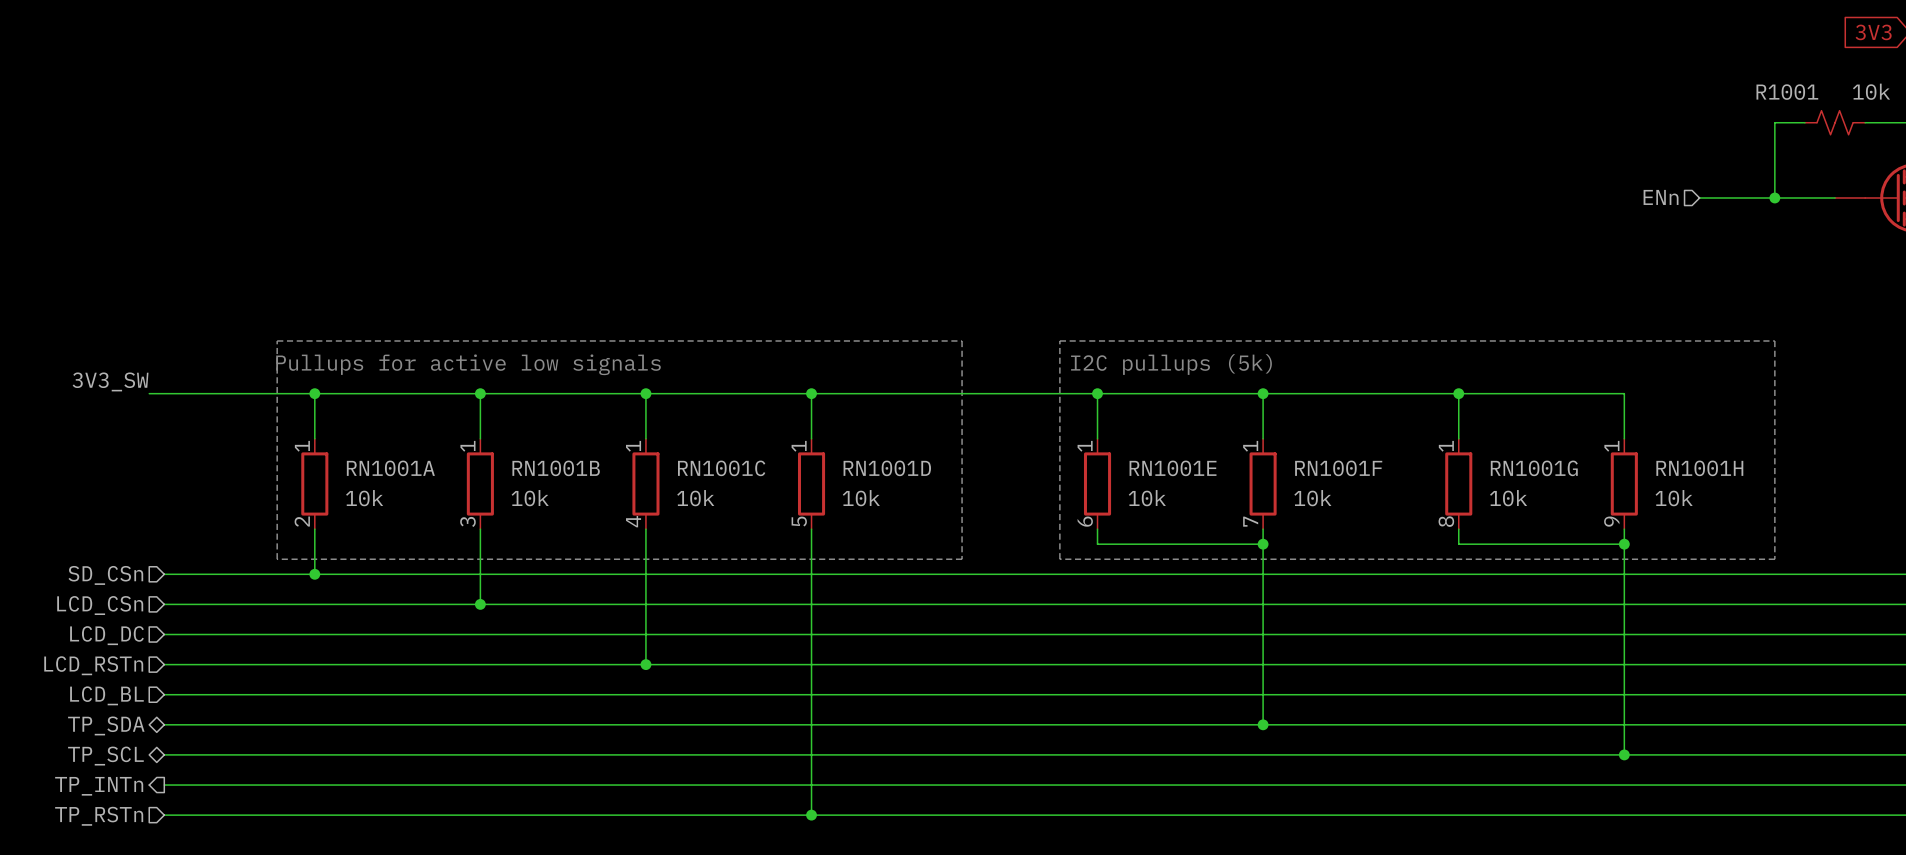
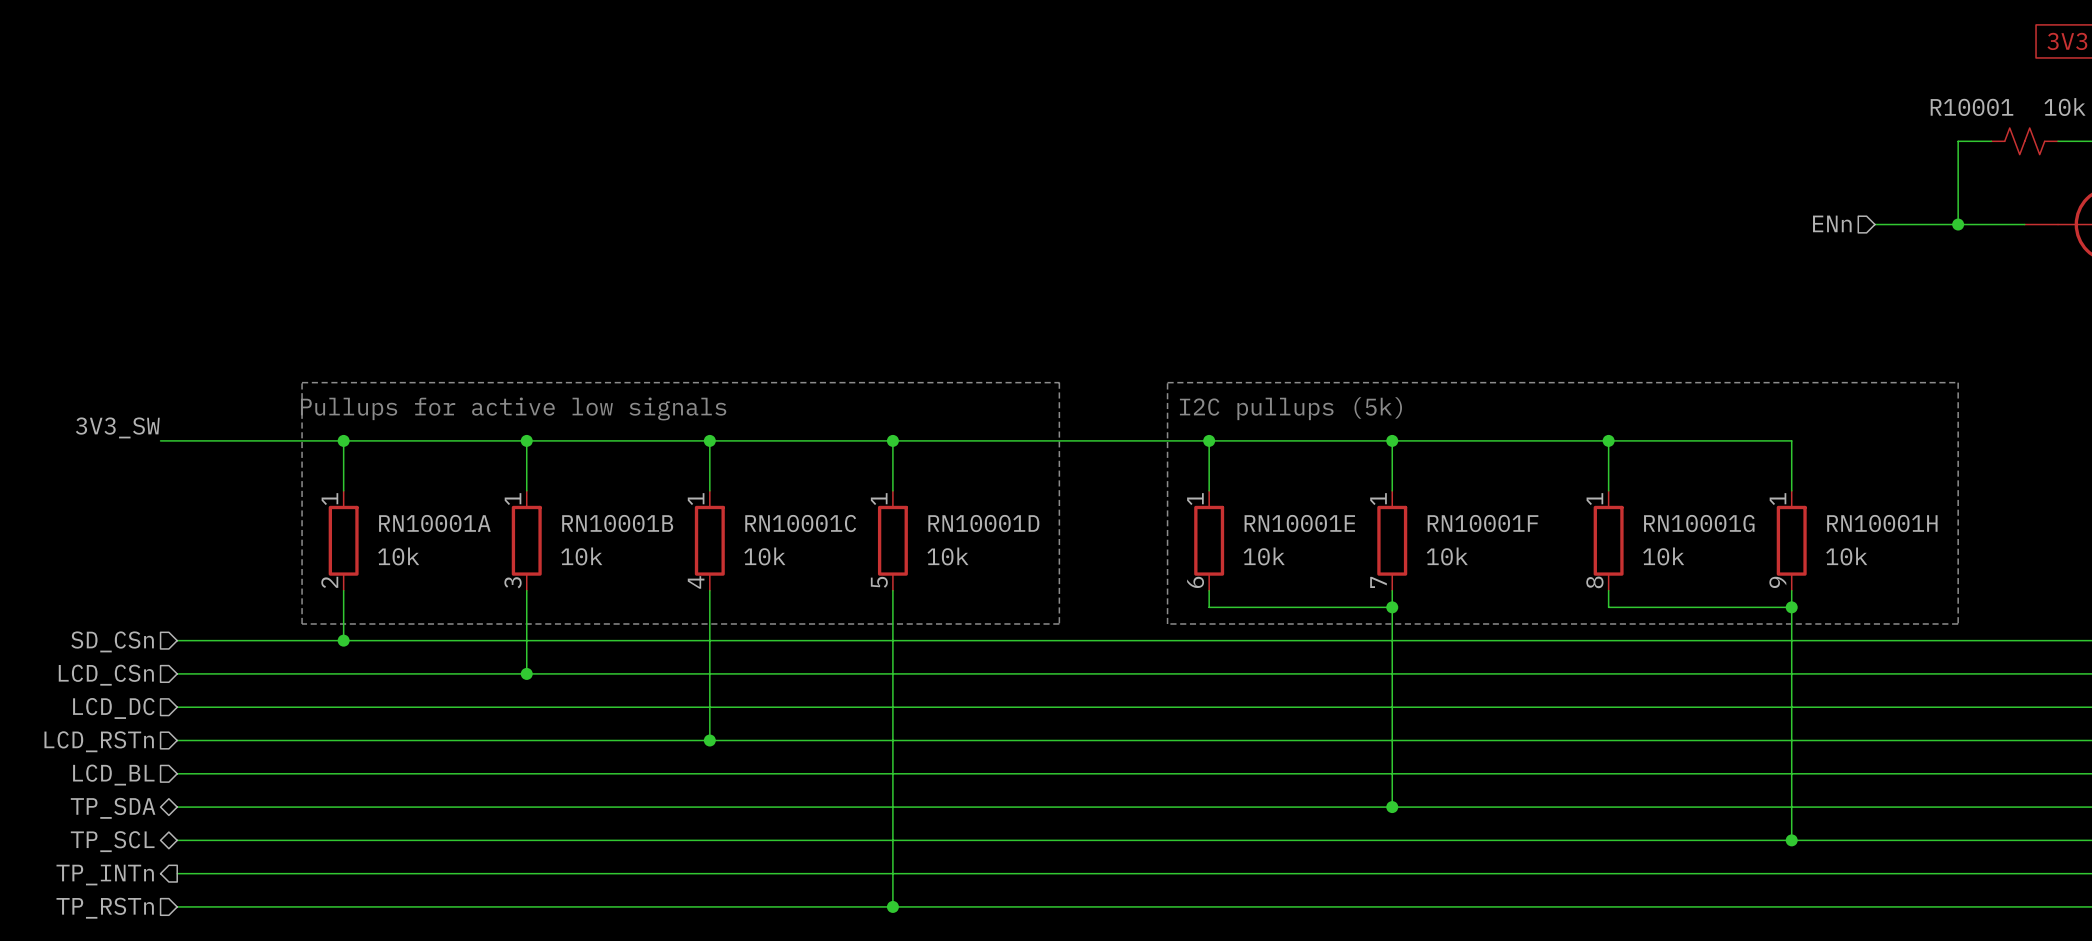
R1001 name: R1001 (1787, 92) -> R10001 (1971, 107)
RN1001A name: RN1001A (390, 468) -> RN10001A (434, 523)
RN1001B name: RN1001B (556, 468) -> RN10001B (617, 523)
RN1001C name: RN1001C (721, 468) -> RN10001C (800, 523)
RN1001D name: RN1001D (887, 468) -> RN10001D (983, 523)
RN1001E name: RN1001E (1173, 468) -> RN10001E (1299, 523)
RN1001F name: RN1001F (1338, 468) -> RN10001F (1483, 523)
RN1001G name: RN1001G (1534, 468) -> RN10001G (1699, 523)
RN1001H name: RN1001H (1699, 468) -> RN10001H (1882, 523)

